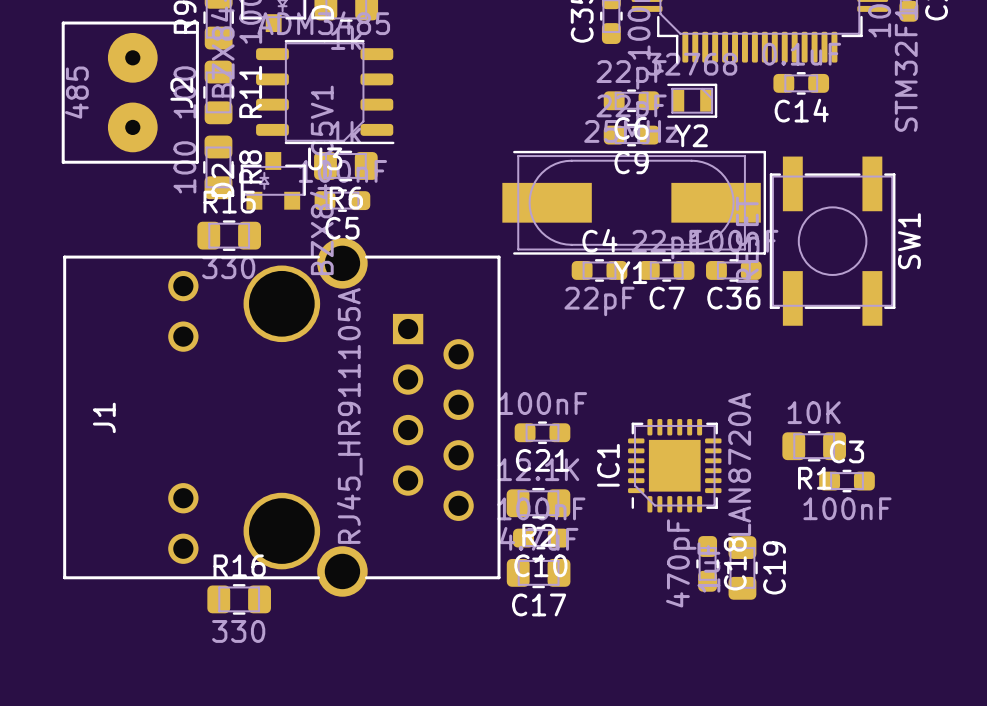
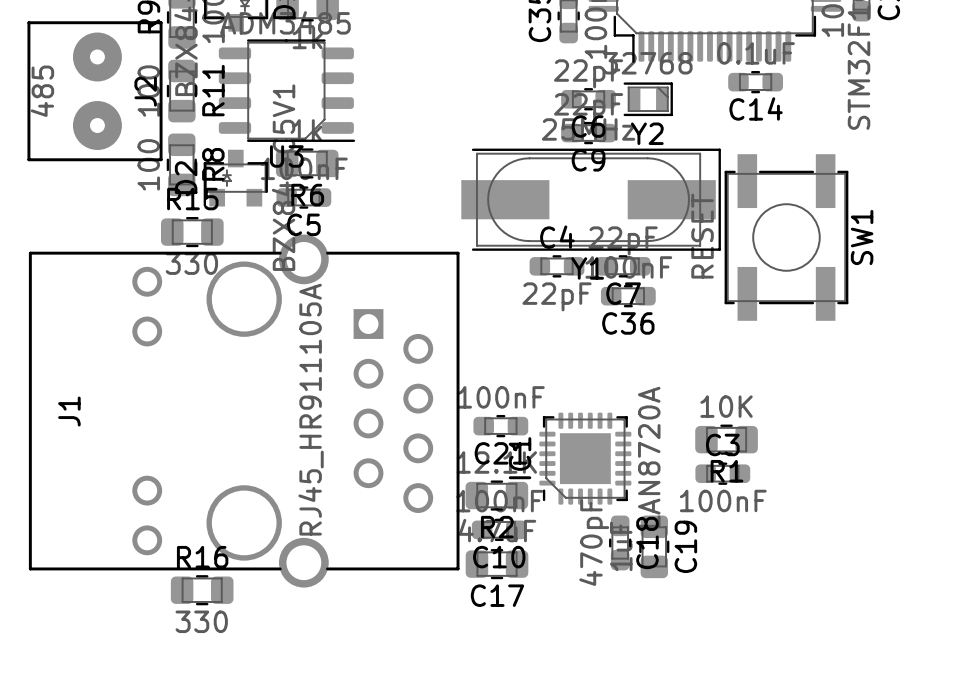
C36 position: (733, 270) -> (628, 296)
R1 position: (814, 446) -> (726, 439)
IC1 position: (674, 465) -> (585, 458)
C3 position: (846, 481) -> (722, 473)
C18 position: (707, 563) -> (620, 542)
C19 position: (742, 567) -> (654, 546)

